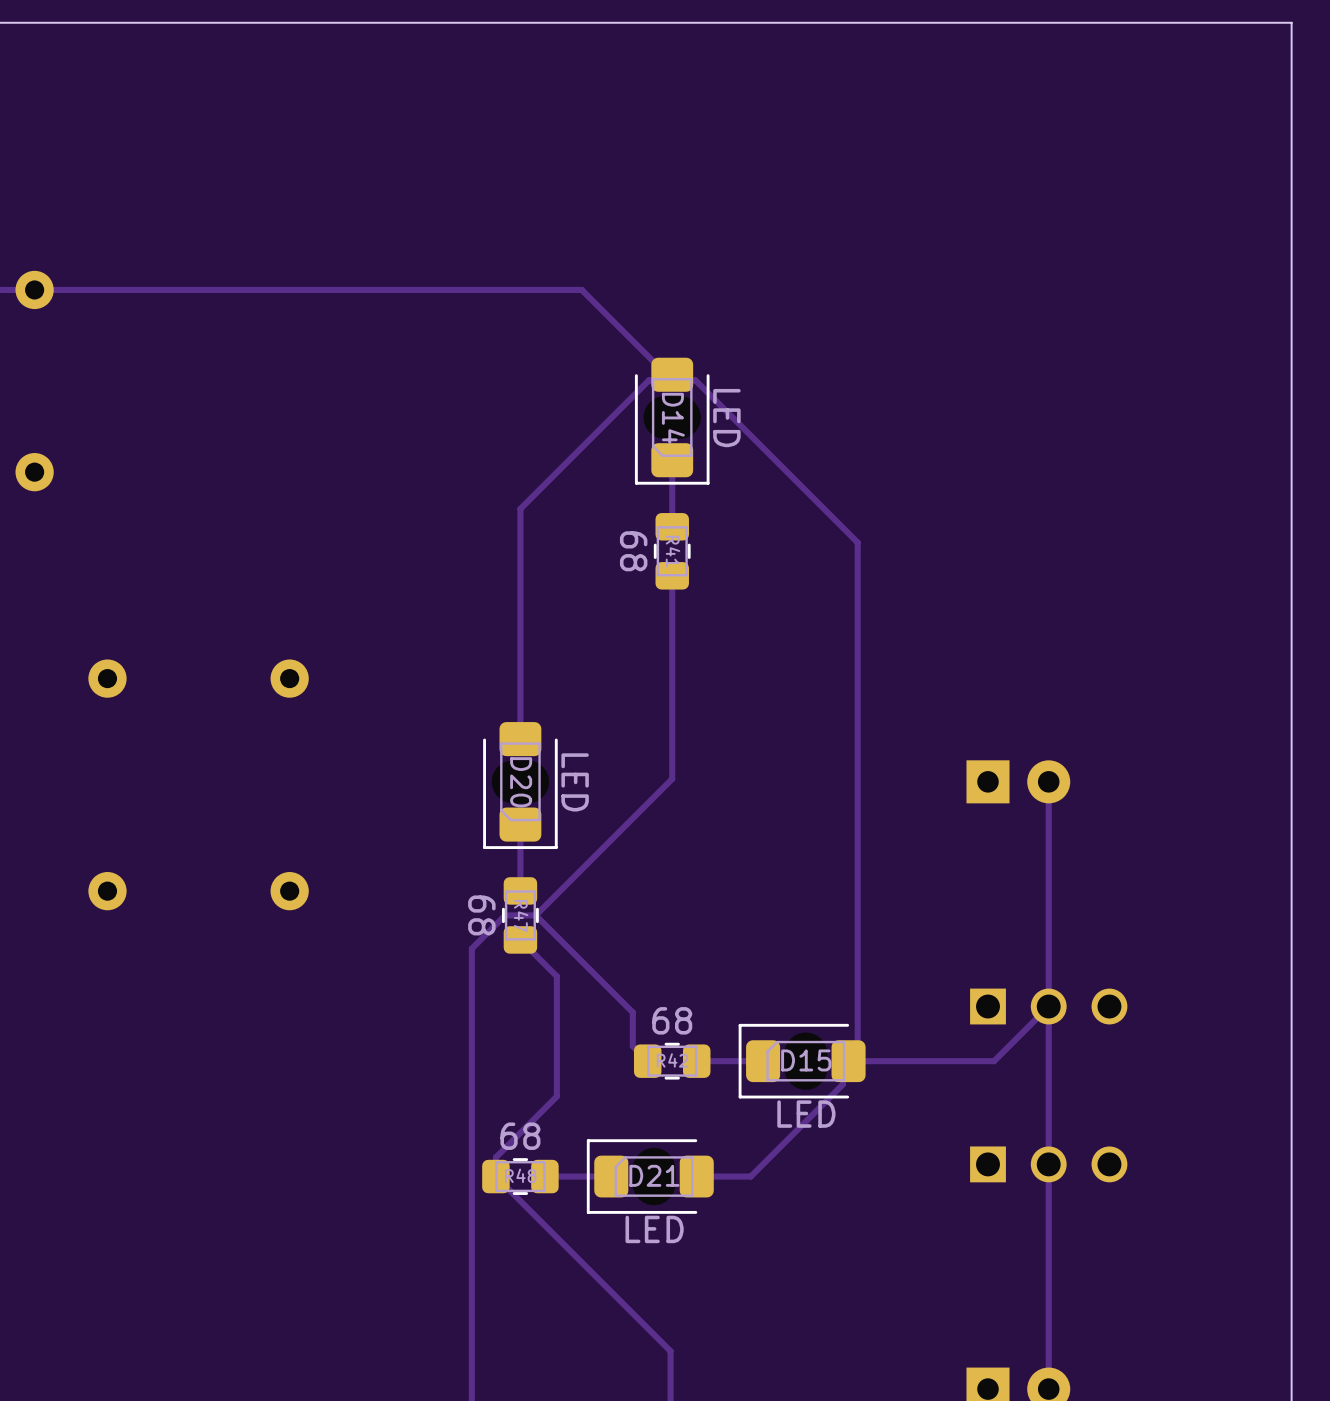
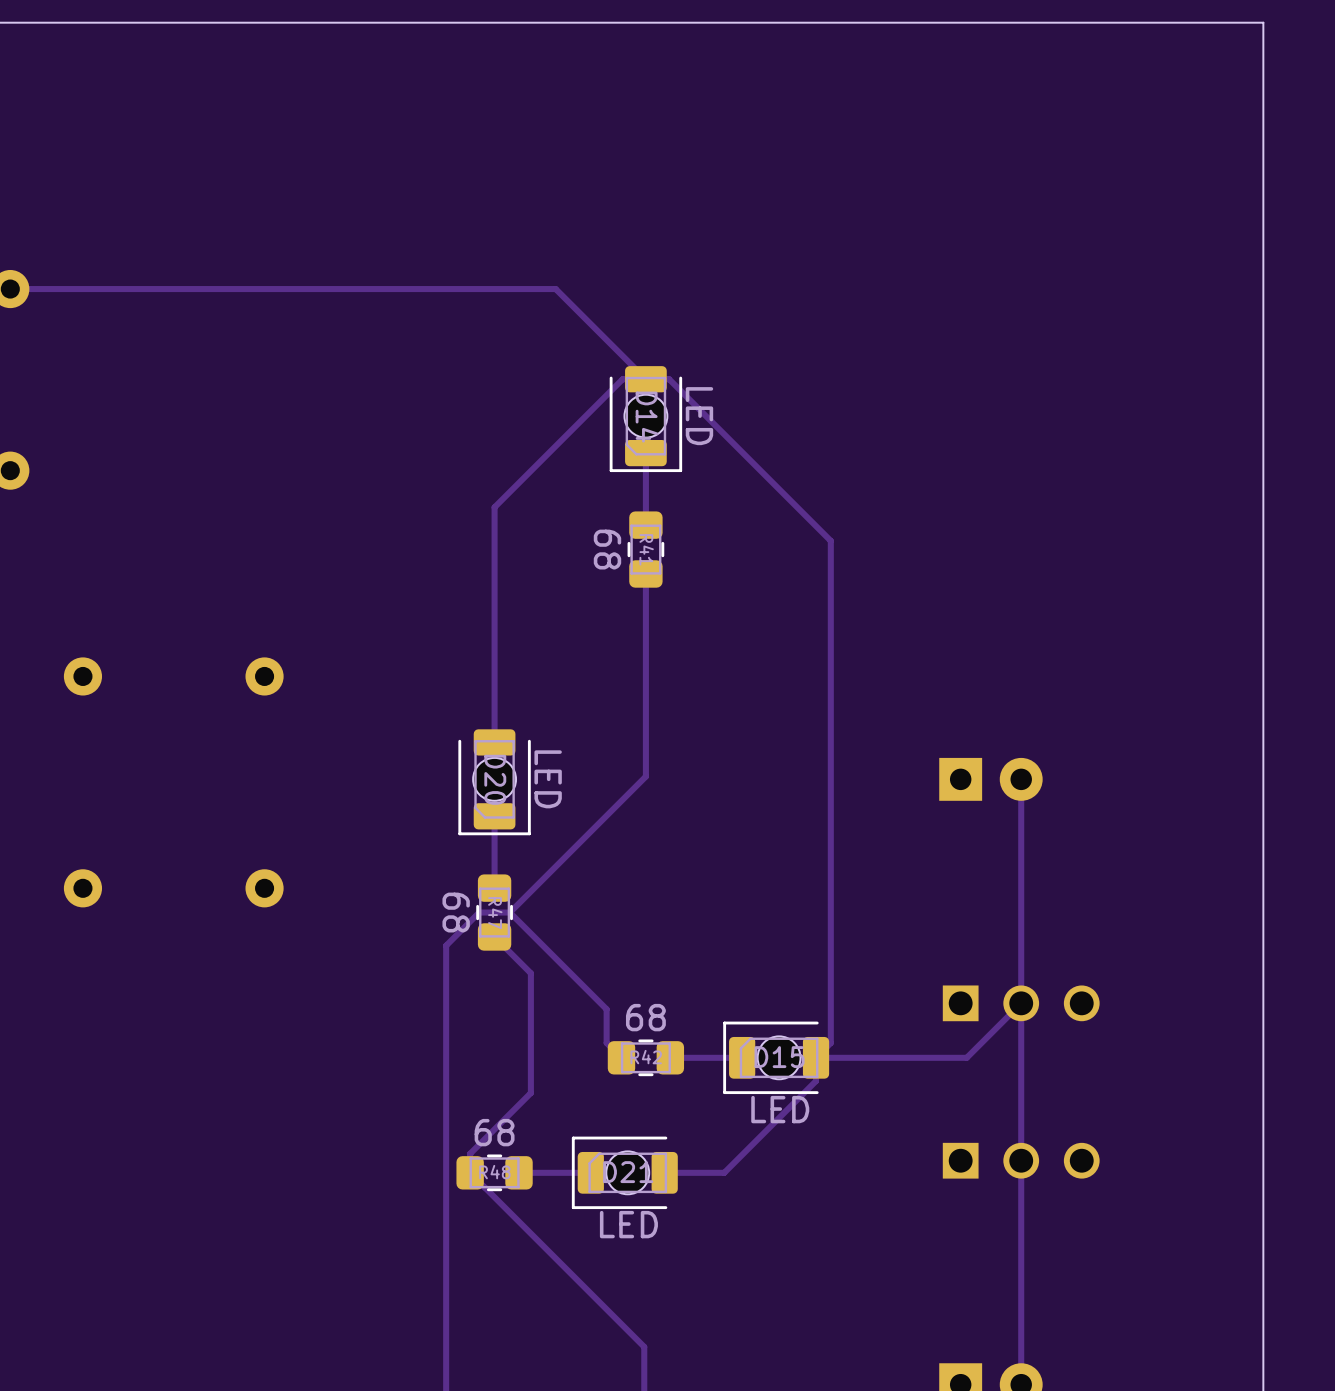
D14 footprint: [634, 357, 710, 485] -> [609, 366, 683, 473]
D20 footprint: [483, 722, 558, 850] -> [458, 729, 531, 836]
D15 footprint: [738, 1023, 866, 1099] -> [723, 1021, 830, 1095]
D21 footprint: [586, 1139, 714, 1214] -> [571, 1136, 678, 1210]

